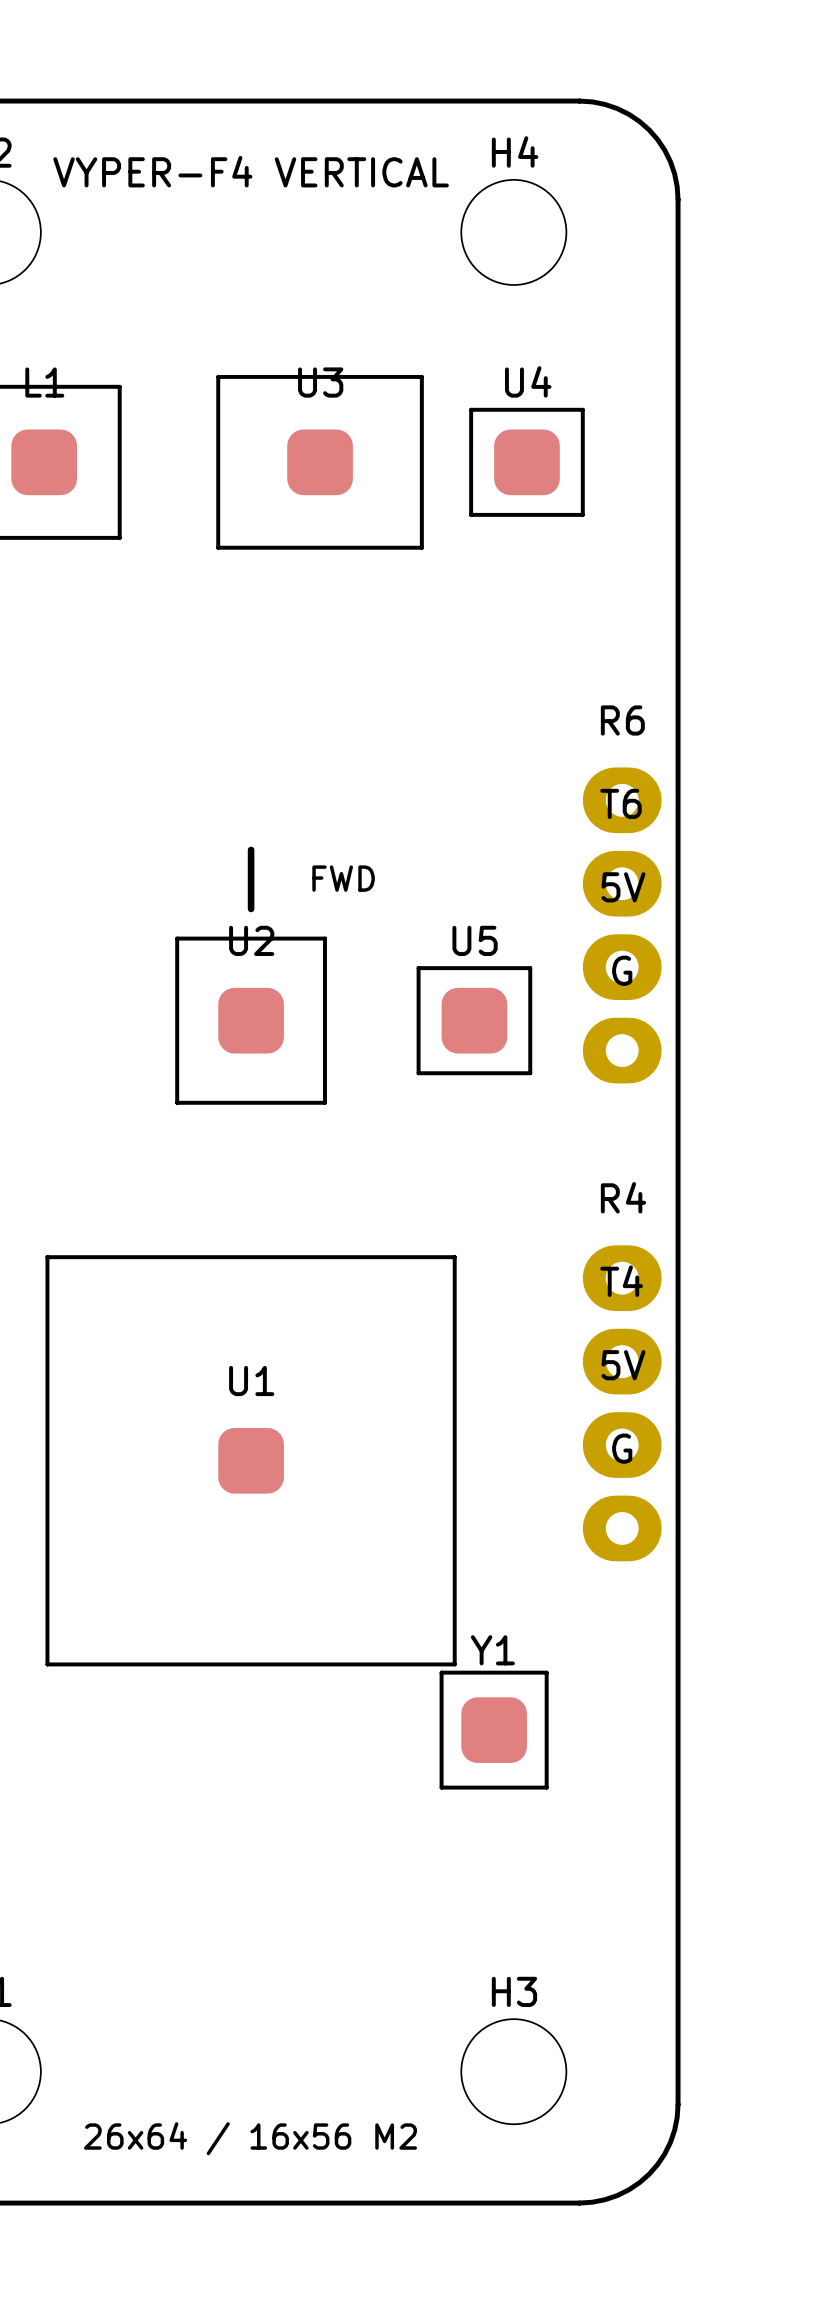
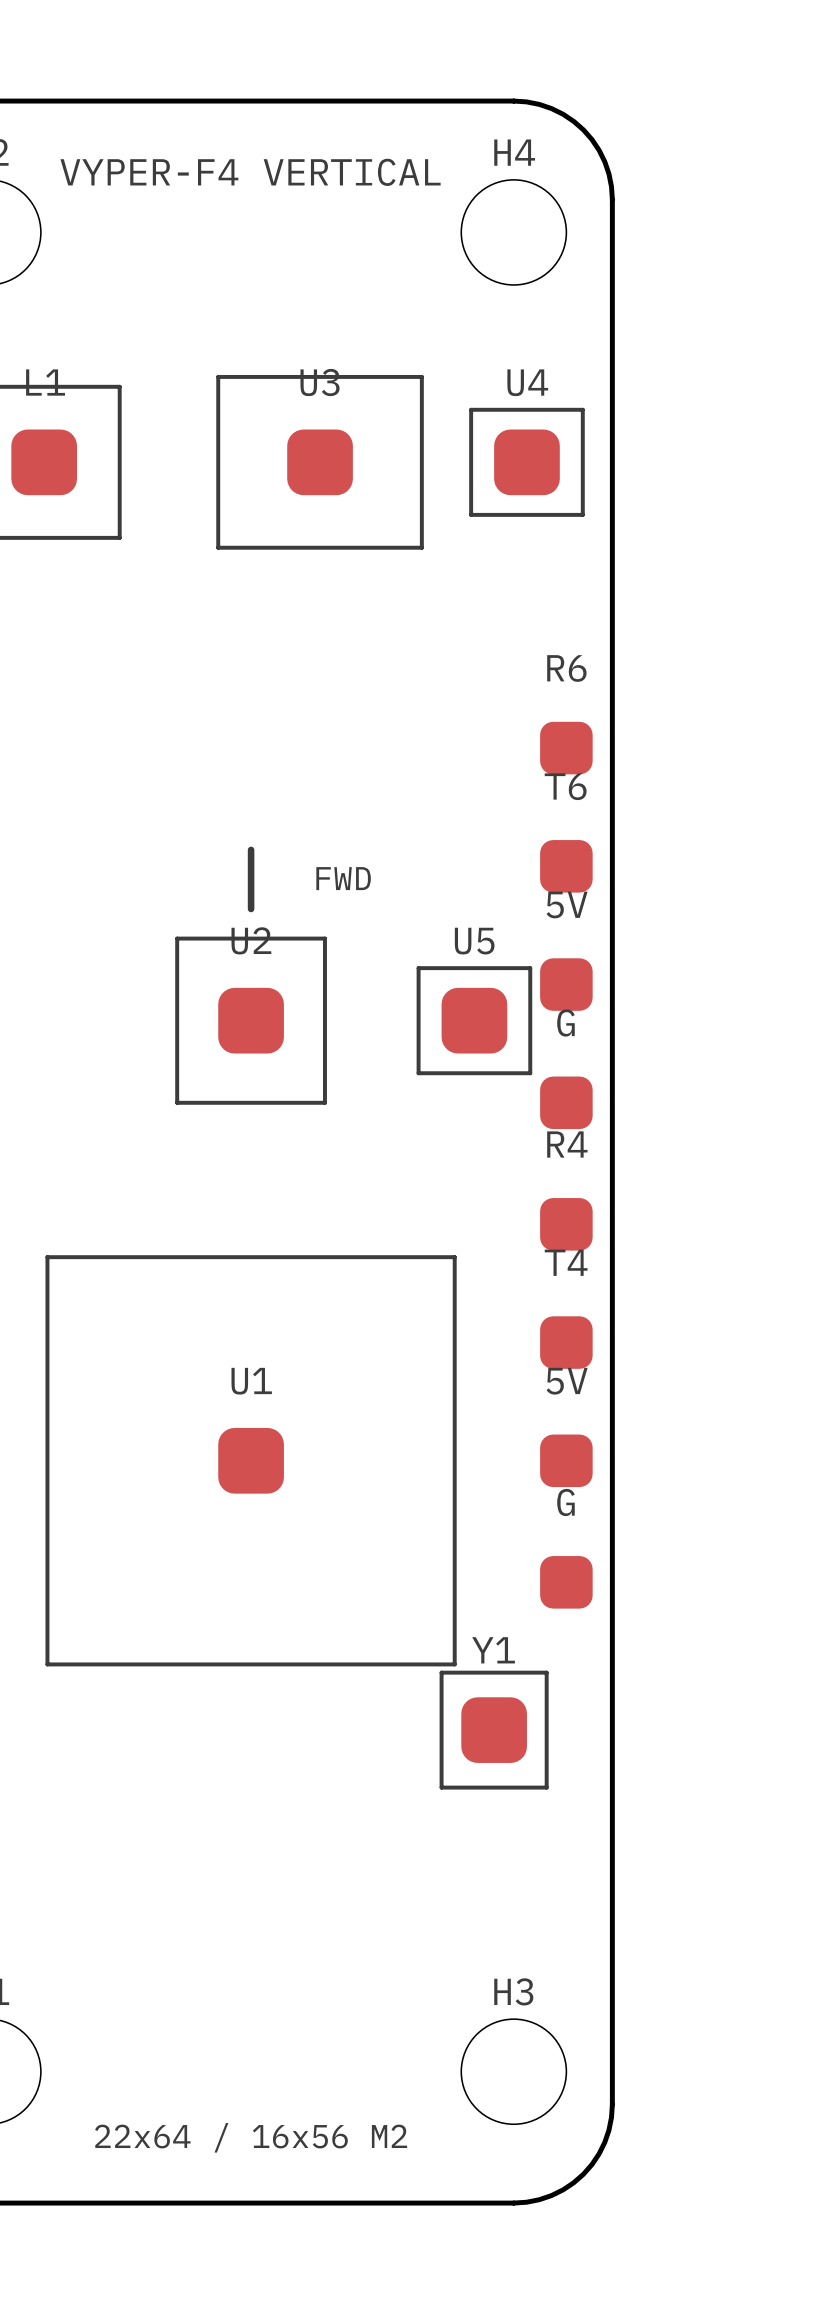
board edge: (513, 101) (592, 101) (605, 104) (628, 114) (649, 129) (664, 150) (674, 174) (678, 199) (677, 2117) (670, 2142) (657, 2164) (649, 2174) (628, 2189) (617, 2195) (592, 2202) (513, 2203) -> (513, 101) (539, 104) (551, 108) (573, 121) (583, 129) (599, 150) (604, 161) (611, 186) (612, 199) (612, 2104) (611, 2117) (604, 2142) (599, 2153) (583, 2174) (573, 2182) (551, 2195) (526, 2202) (513, 2203)
R6 footprint: [582, 767, 662, 834] -> [540, 721, 593, 775]
T6 footprint: [582, 850, 662, 917] -> [540, 840, 593, 893]
5V: (622, 967) -> none
5V: none -> (566, 984)
G: (622, 1050) -> none
G: none -> (566, 1102)
R4 footprint: [582, 1245, 662, 1312] -> [540, 1198, 593, 1251]
T4 footprint: [582, 1328, 662, 1395] -> [540, 1316, 593, 1369]
5V: (622, 1445) -> none
5V: none -> (566, 1460)
G: (622, 1528) -> none
G: none -> (566, 1582)
text: 26x64 / 16x56 M2 (250, 2138) -> 22x64 / 16x56 M2 (251, 2137)

